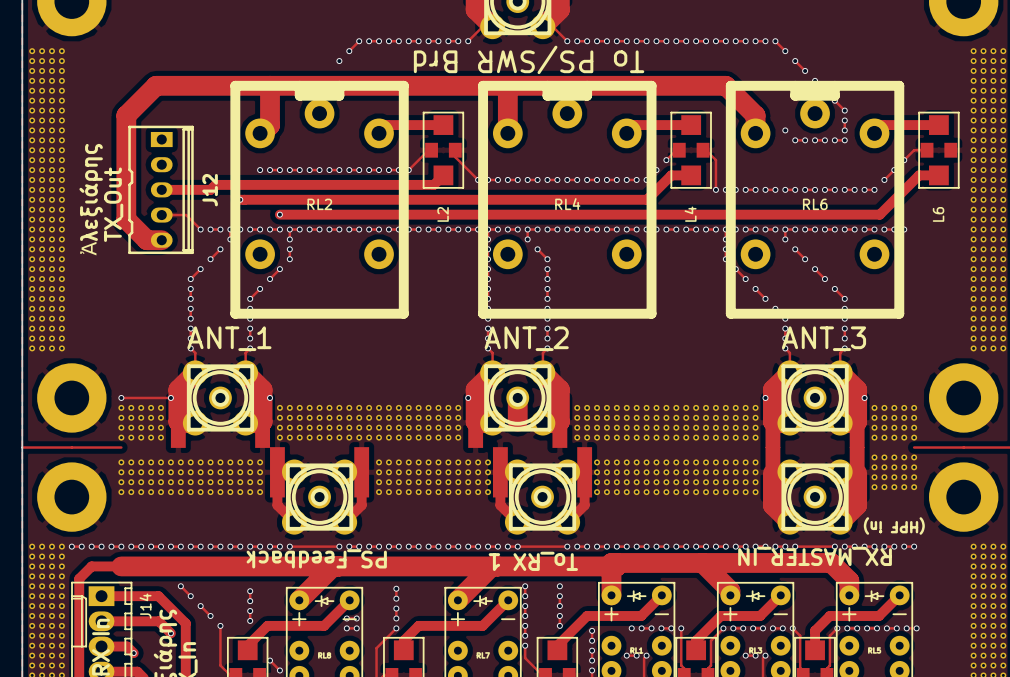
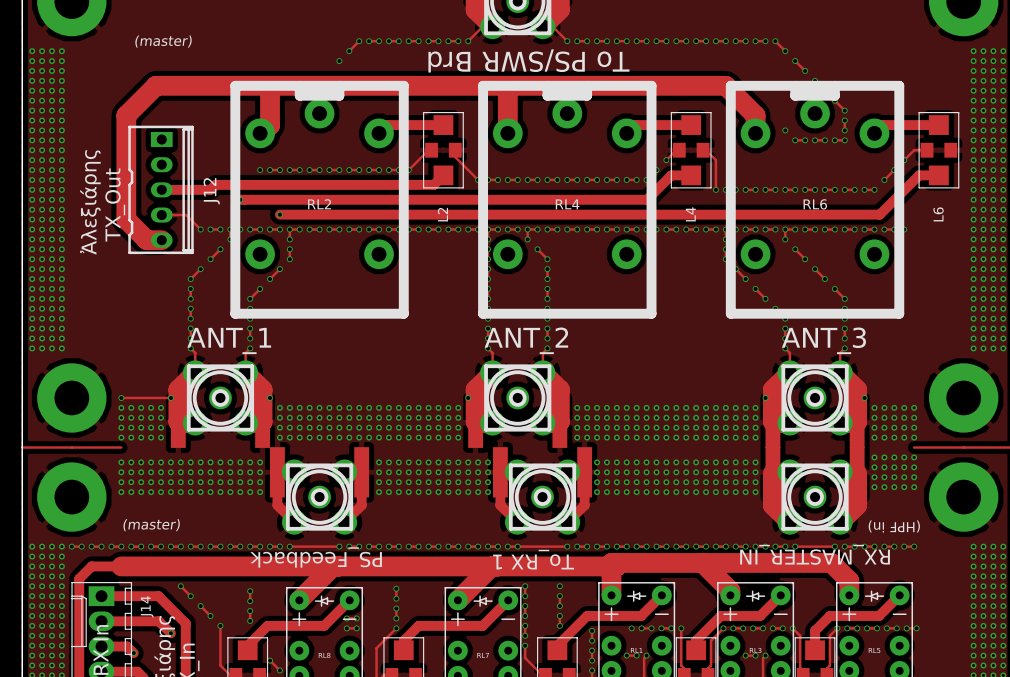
text: none -> (master) (163, 41)
track: (517, 397) (517, 421) -> none
text: none -> (master) (151, 525)

